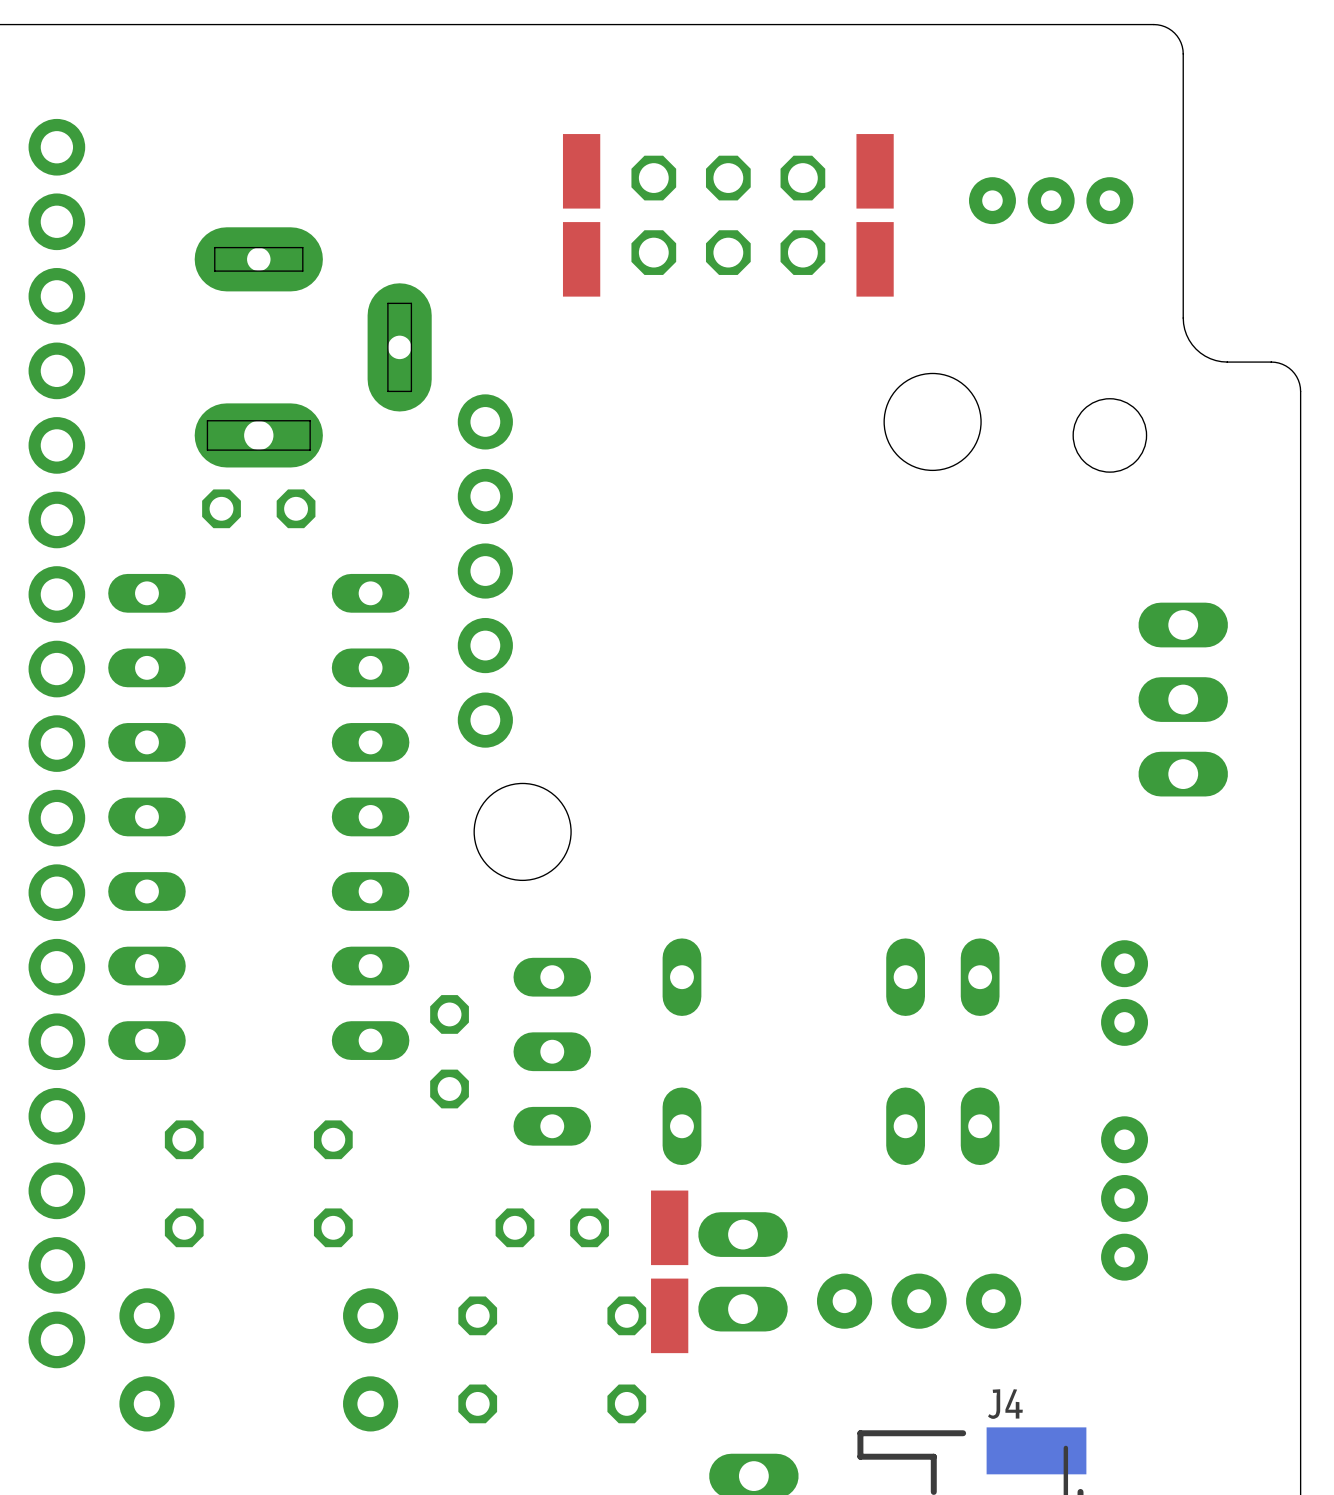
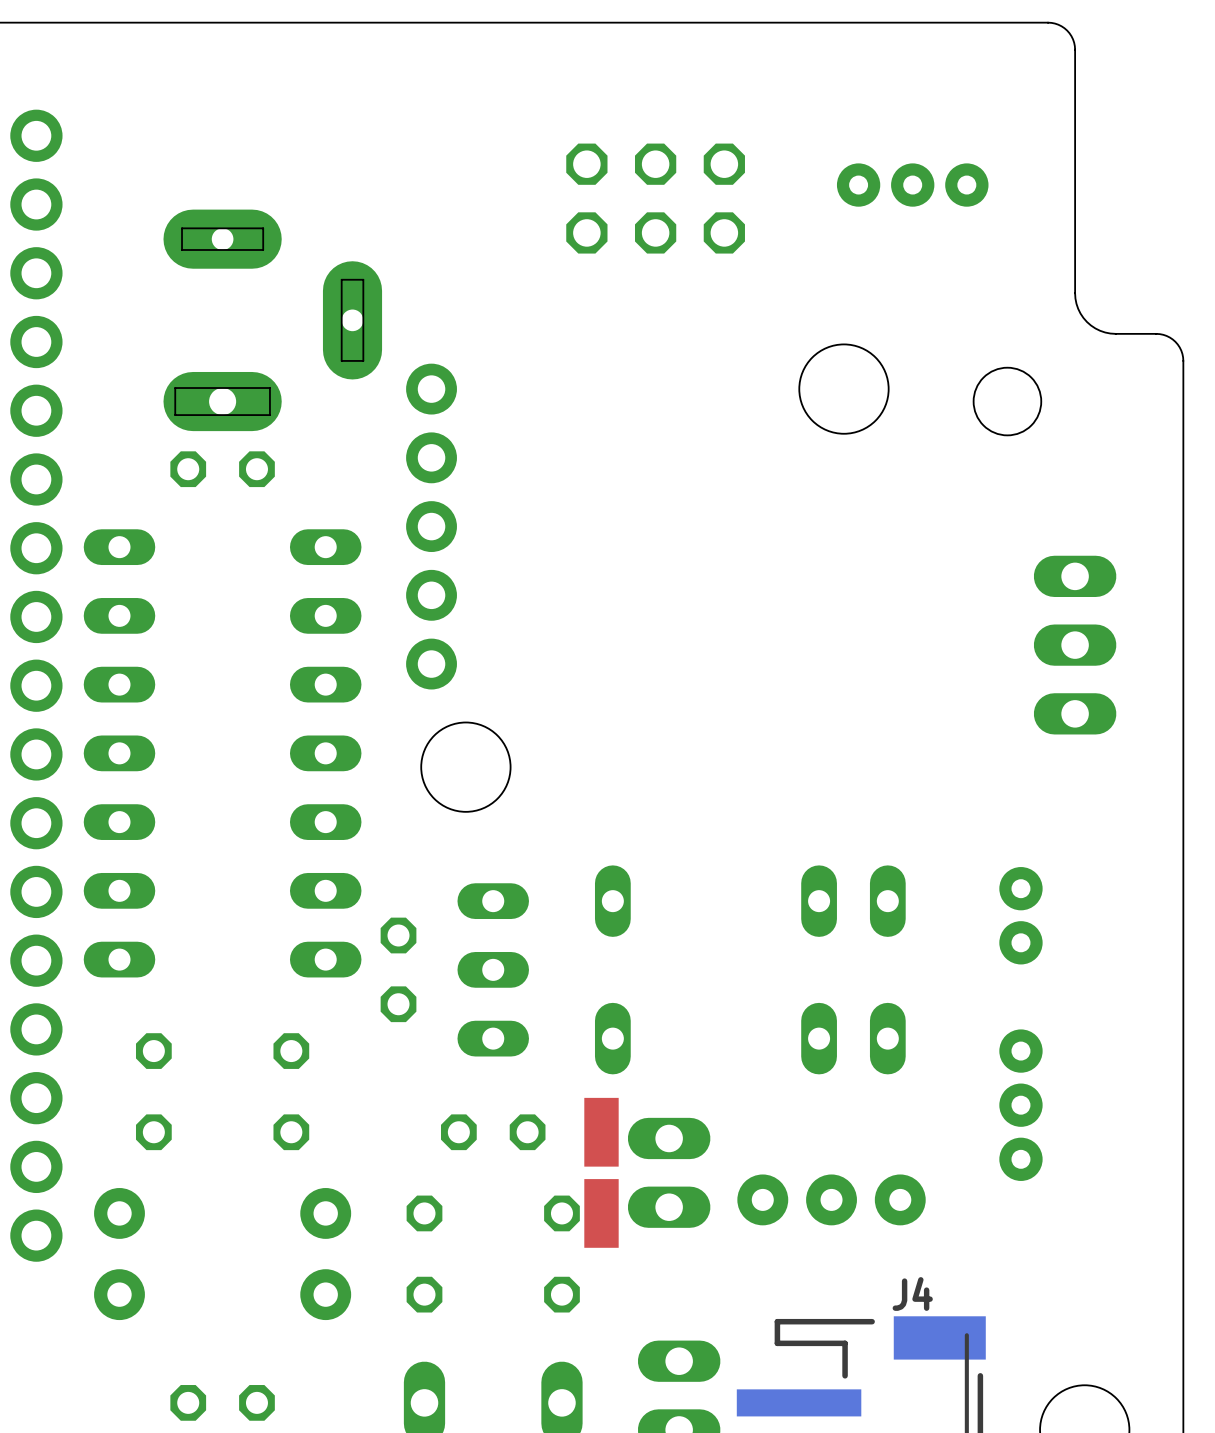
part: (581, 171) -> none
part: (875, 171) -> none
part position: (1051, 200) -> (912, 185)
part: (581, 259) -> none
part: (875, 259) -> none

